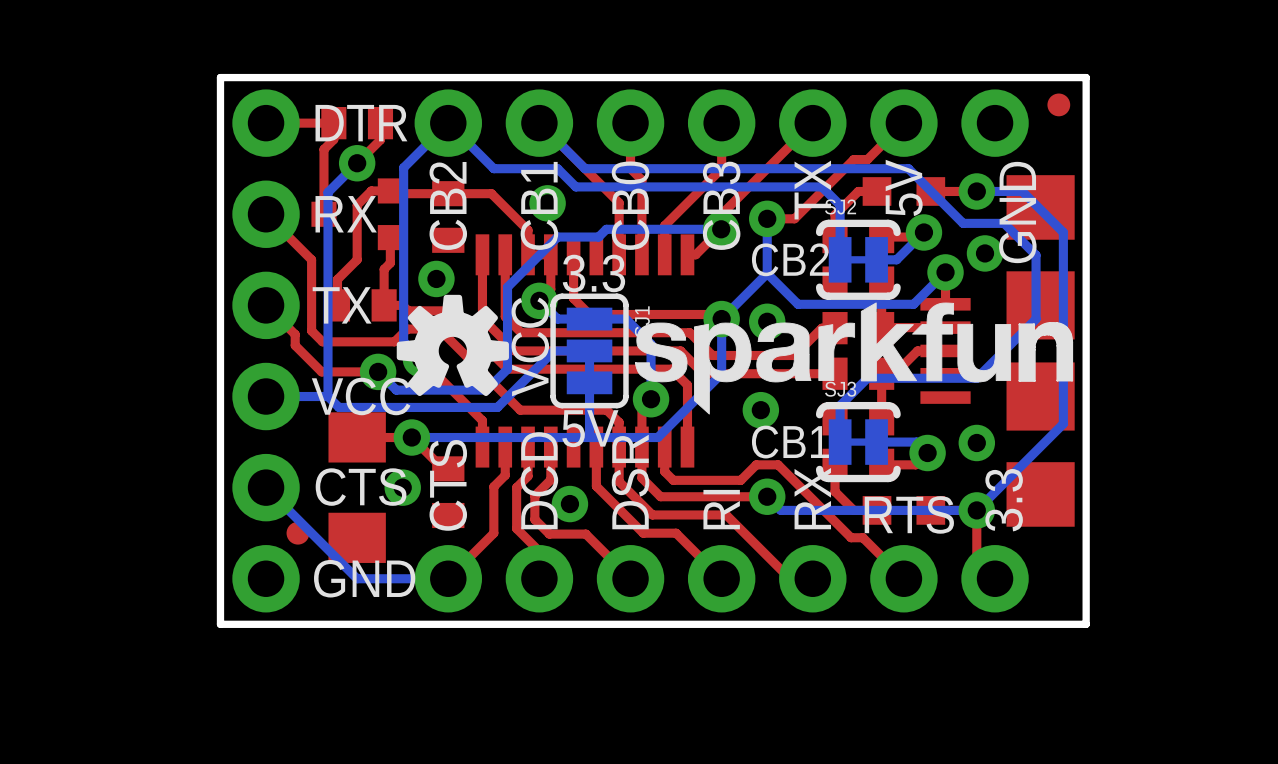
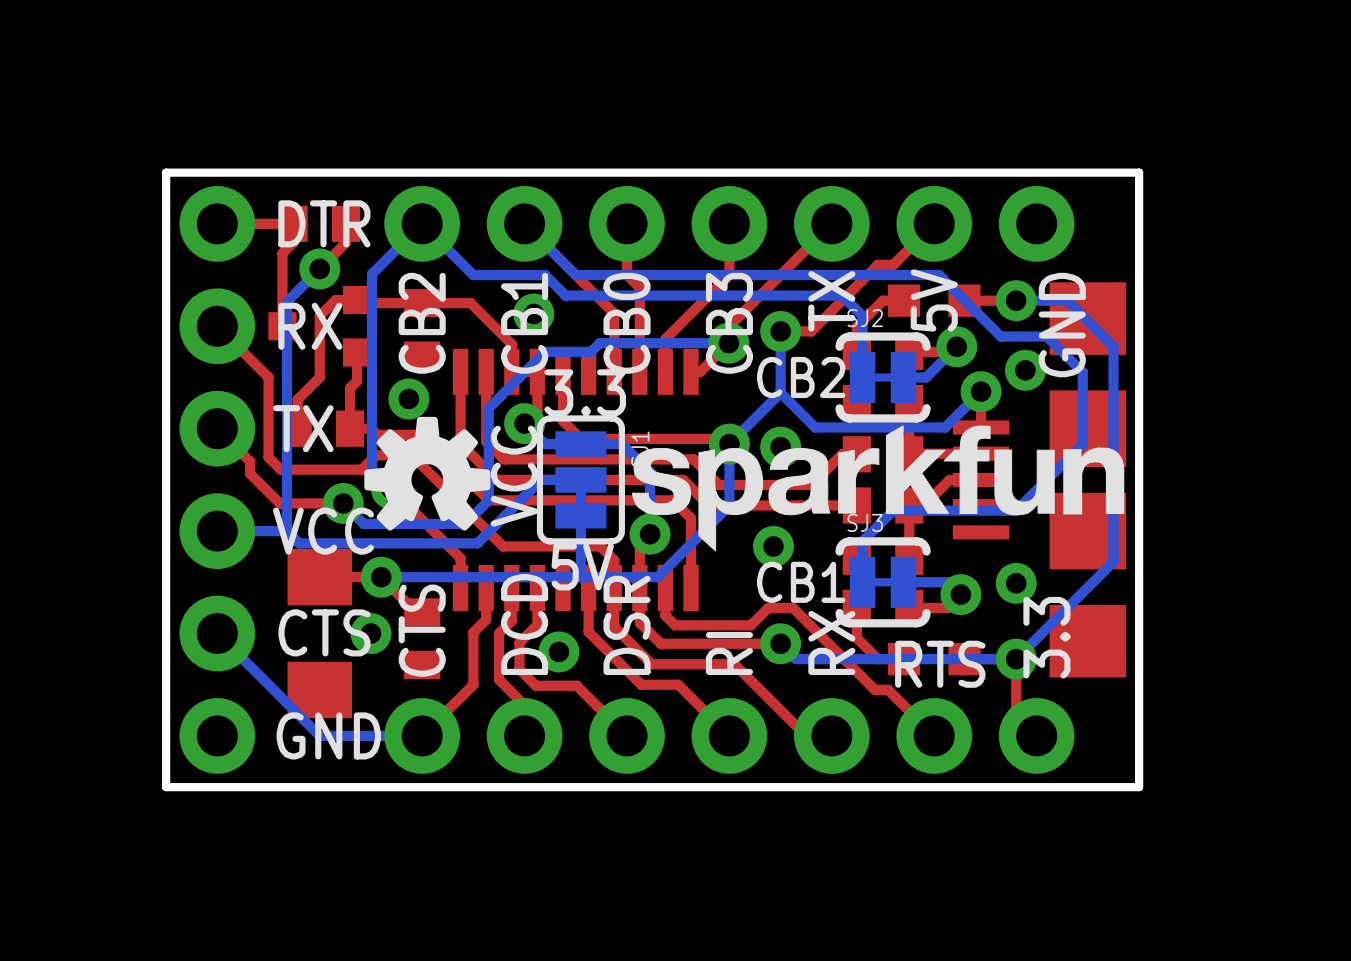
part: (1058, 104) -> none
part: (297, 533) -> none

